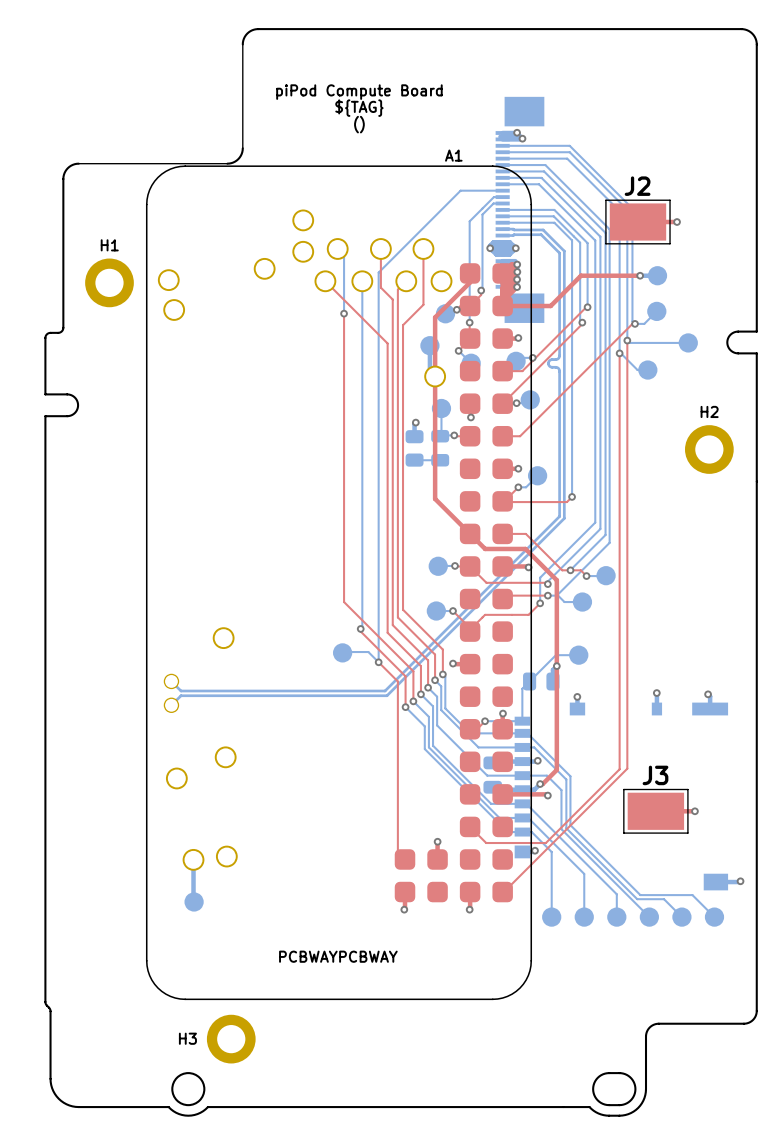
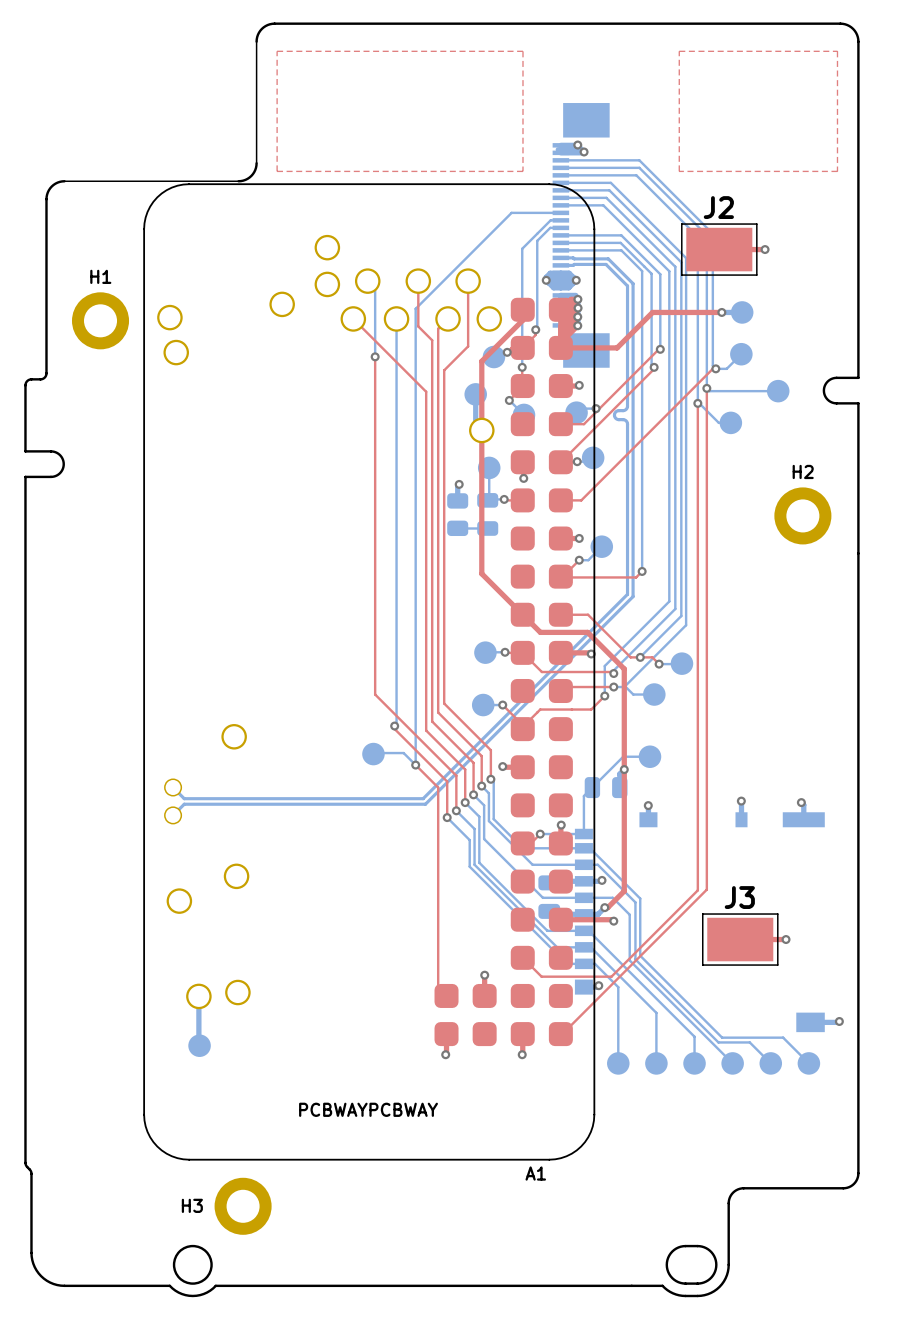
top zone outline: none -> (277, 51) (522, 51) (522, 171) (277, 171) (277, 51)
top zone outline: none -> (679, 51) (679, 171) (837, 171) (837, 51) (679, 51)
text: piPod Compute Board (359, 92) -> none
text: ${TAG} (359, 108) -> none
text: () (359, 124) -> none
A1 name position: A1 (453, 155) -> A1 (535, 1173)

